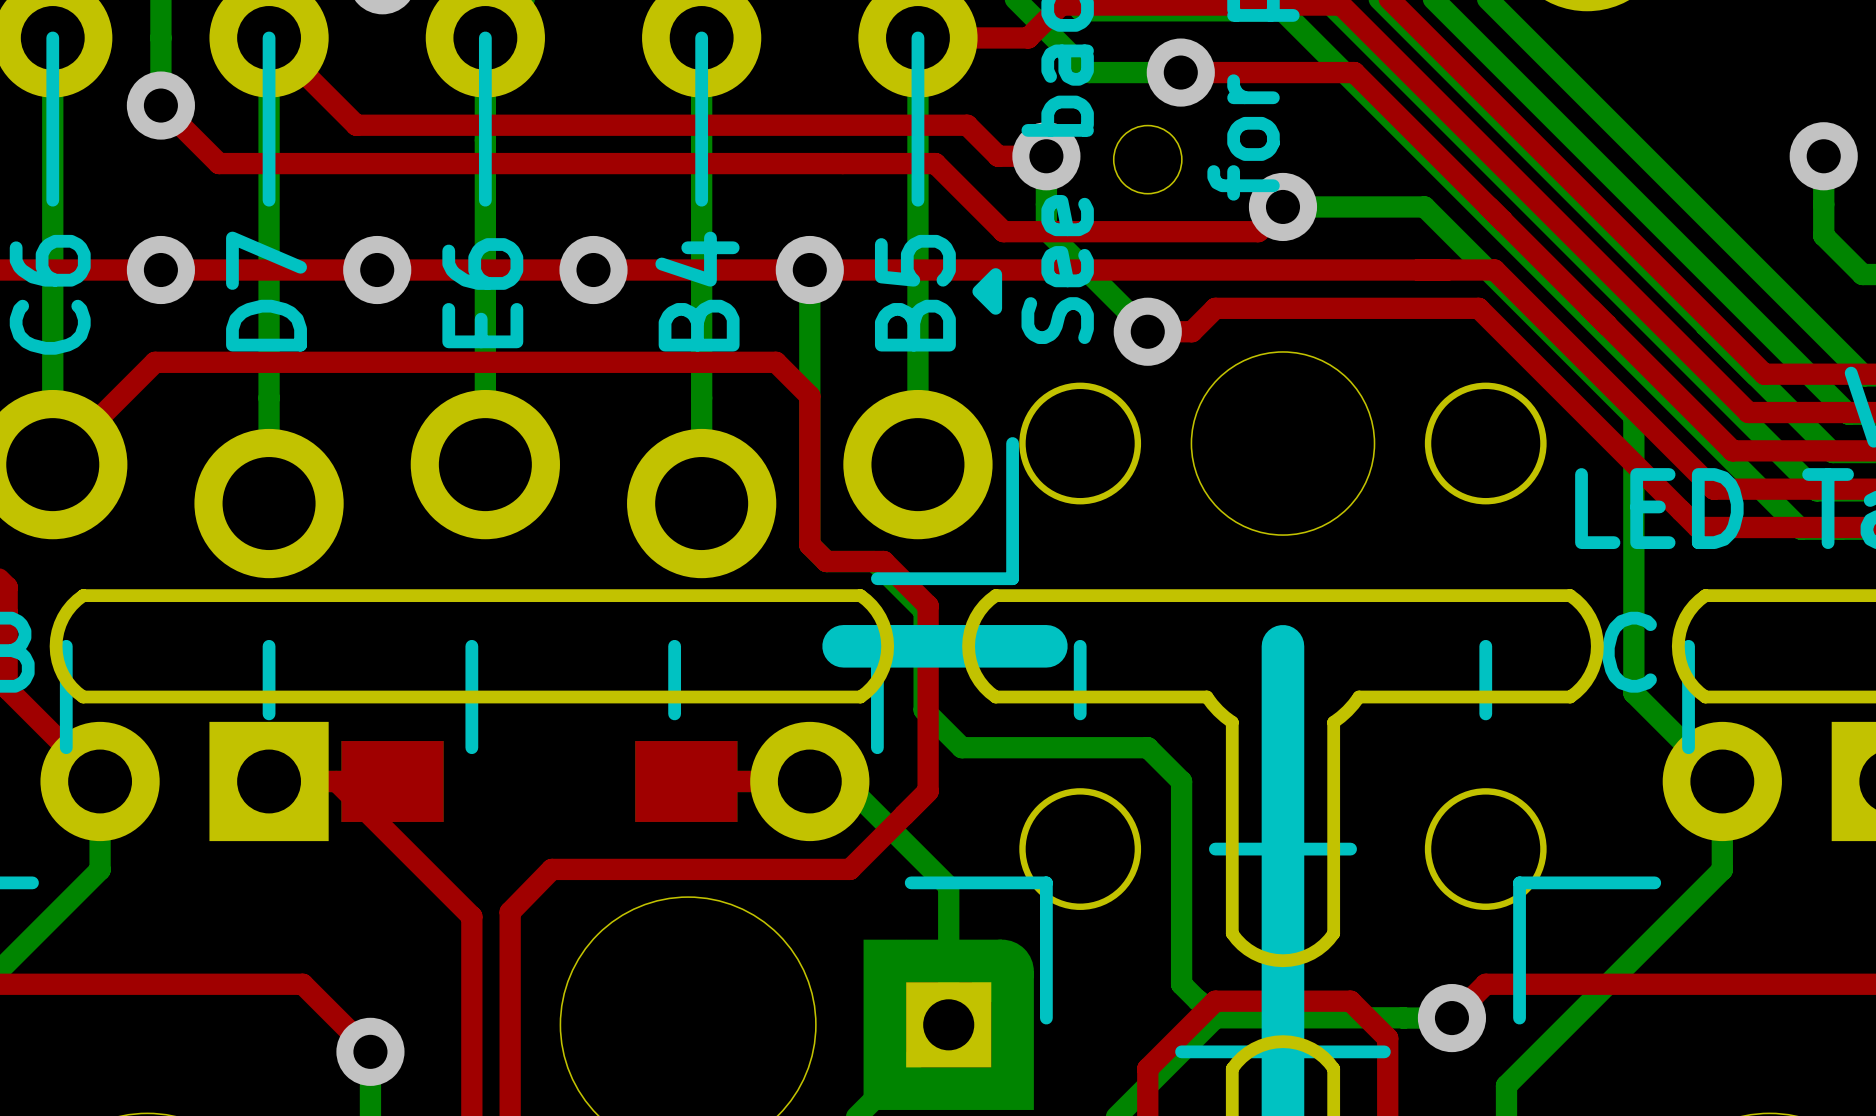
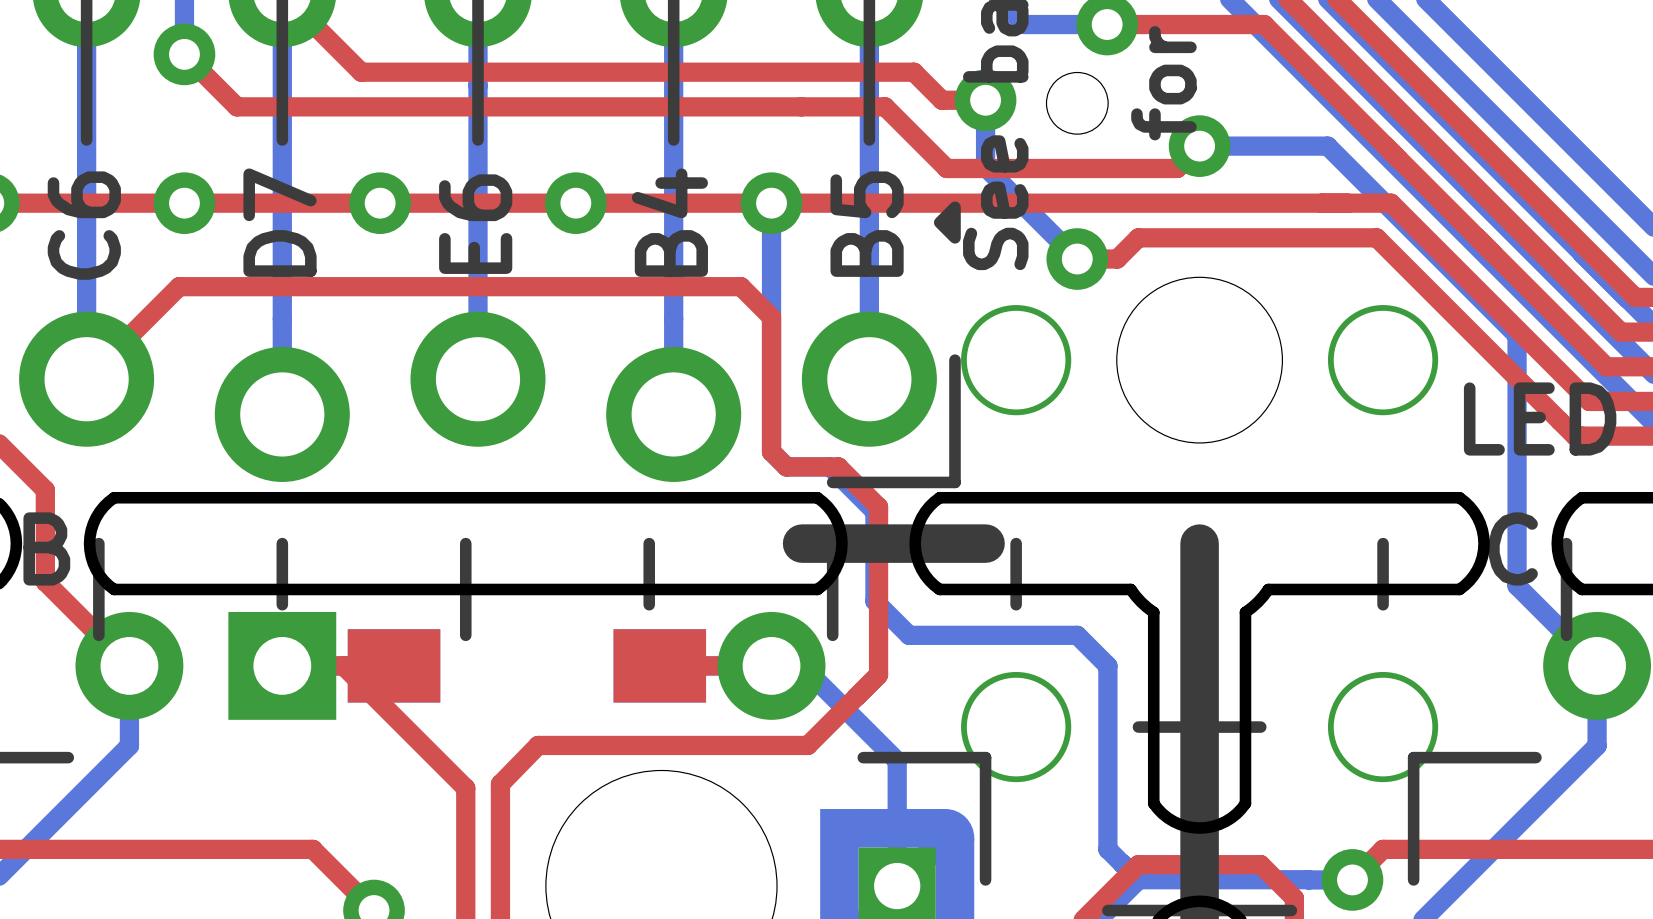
drawing position: (987, 291) -> (947, 222)

